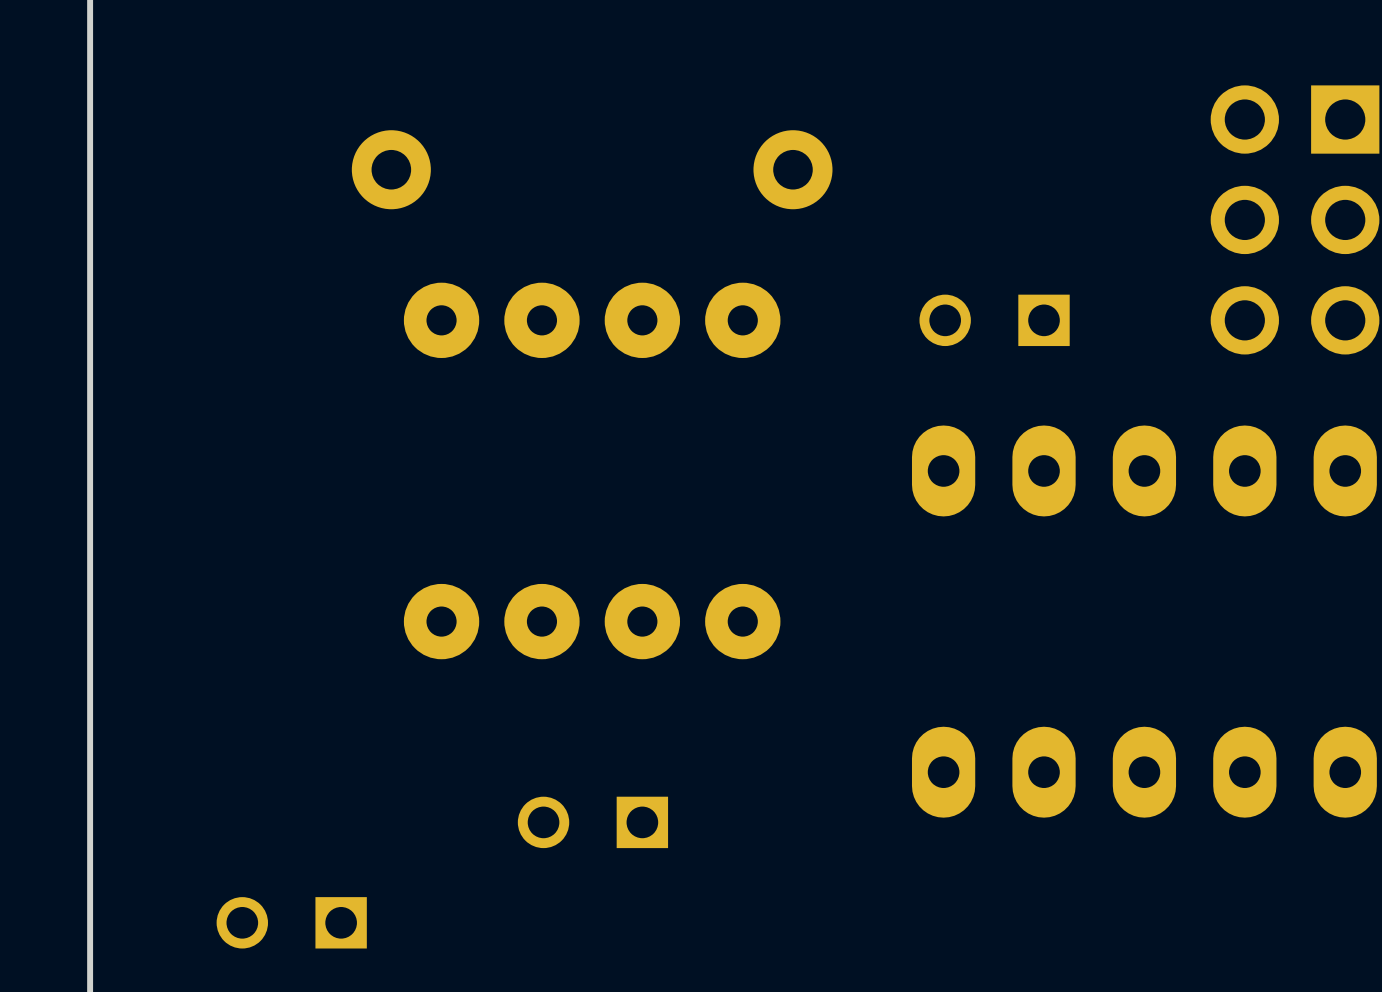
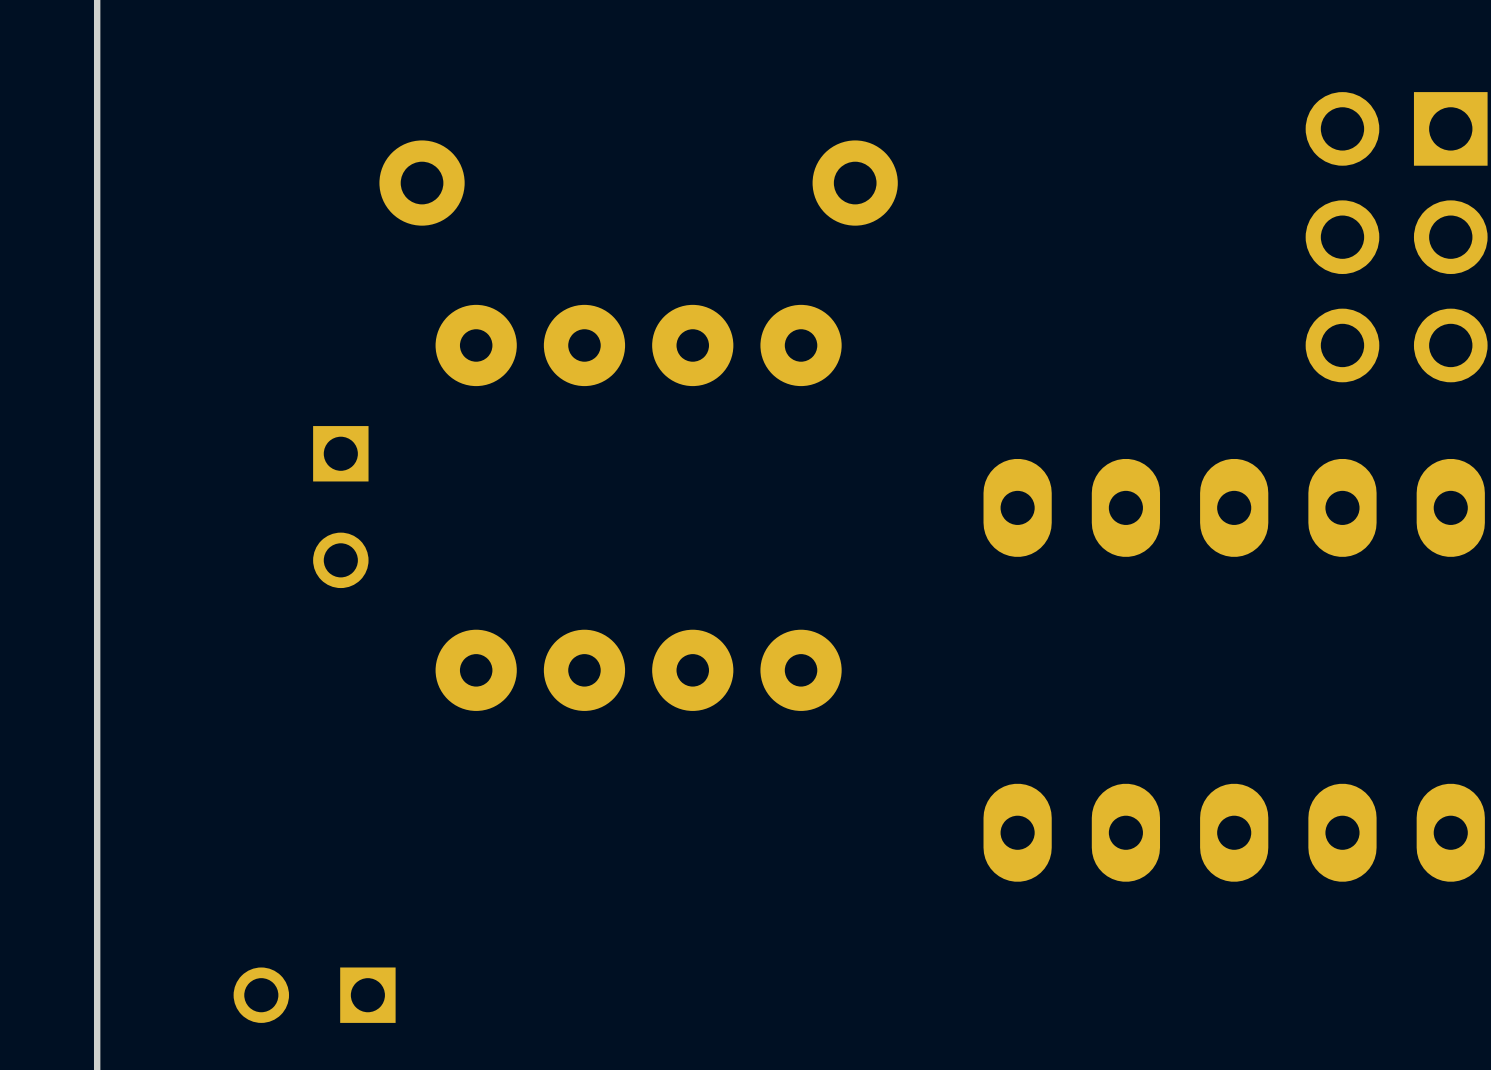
part: (994, 320) -> none
part: none -> (340, 507)
part: (592, 822) -> none

